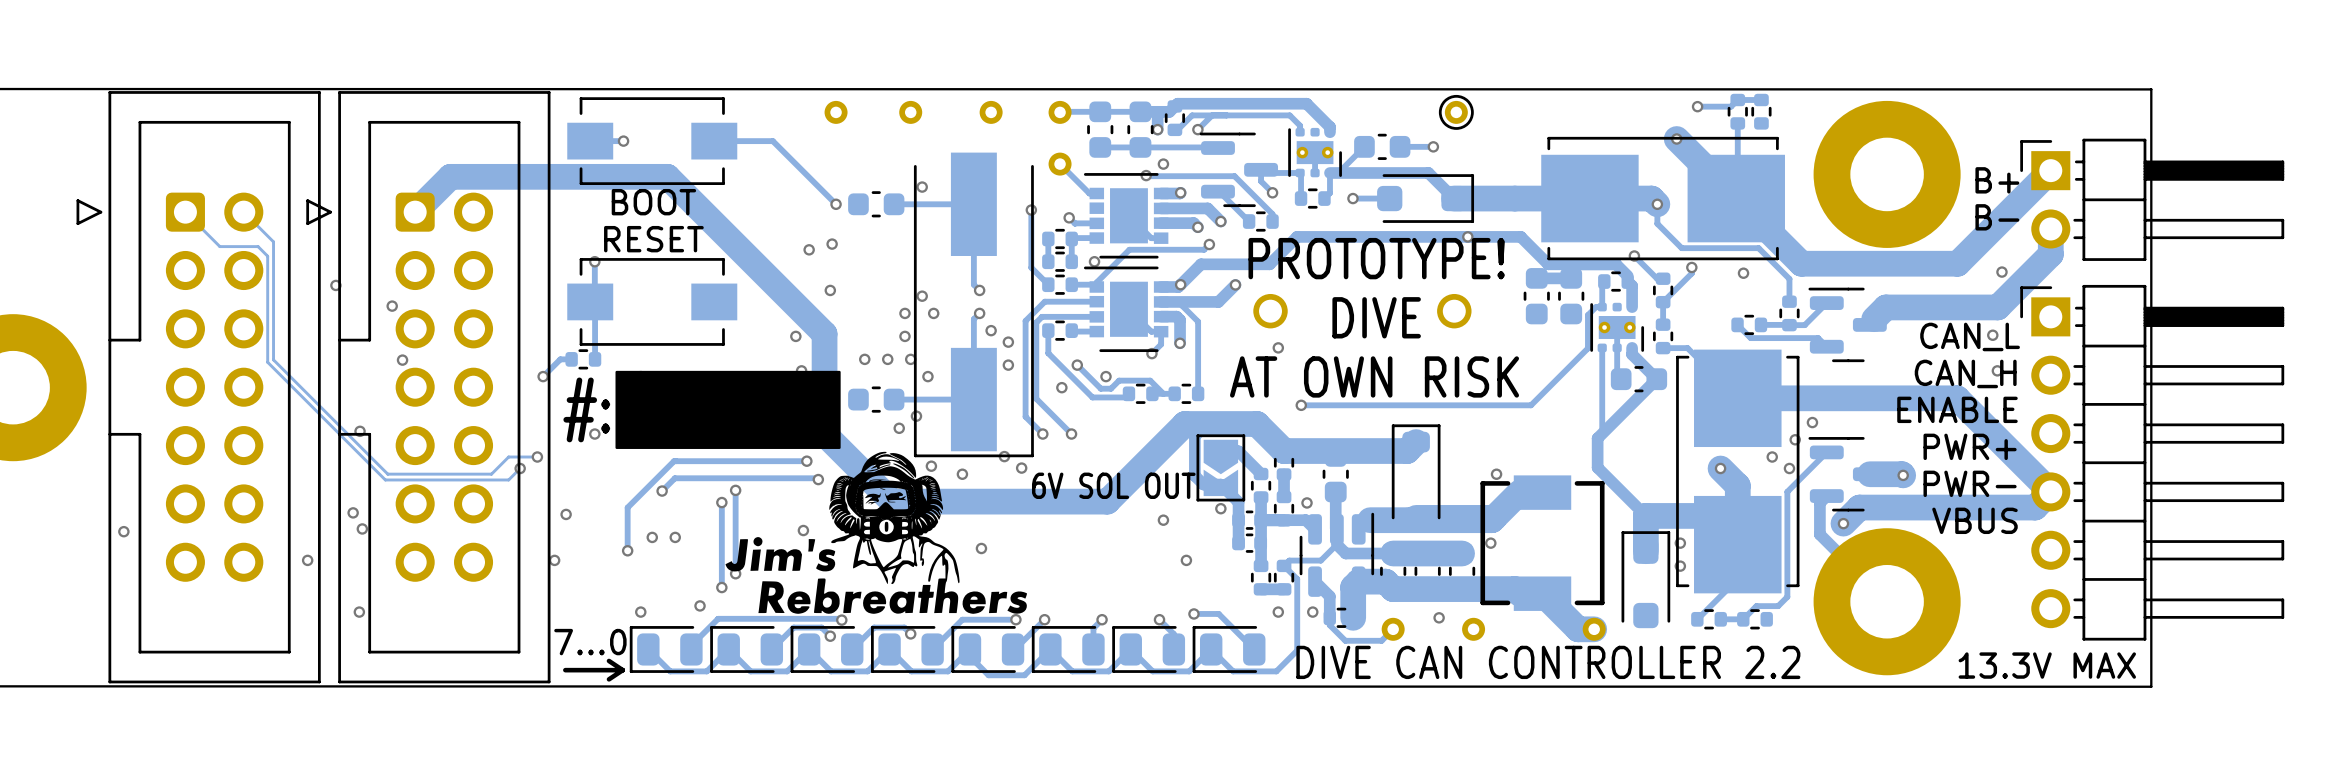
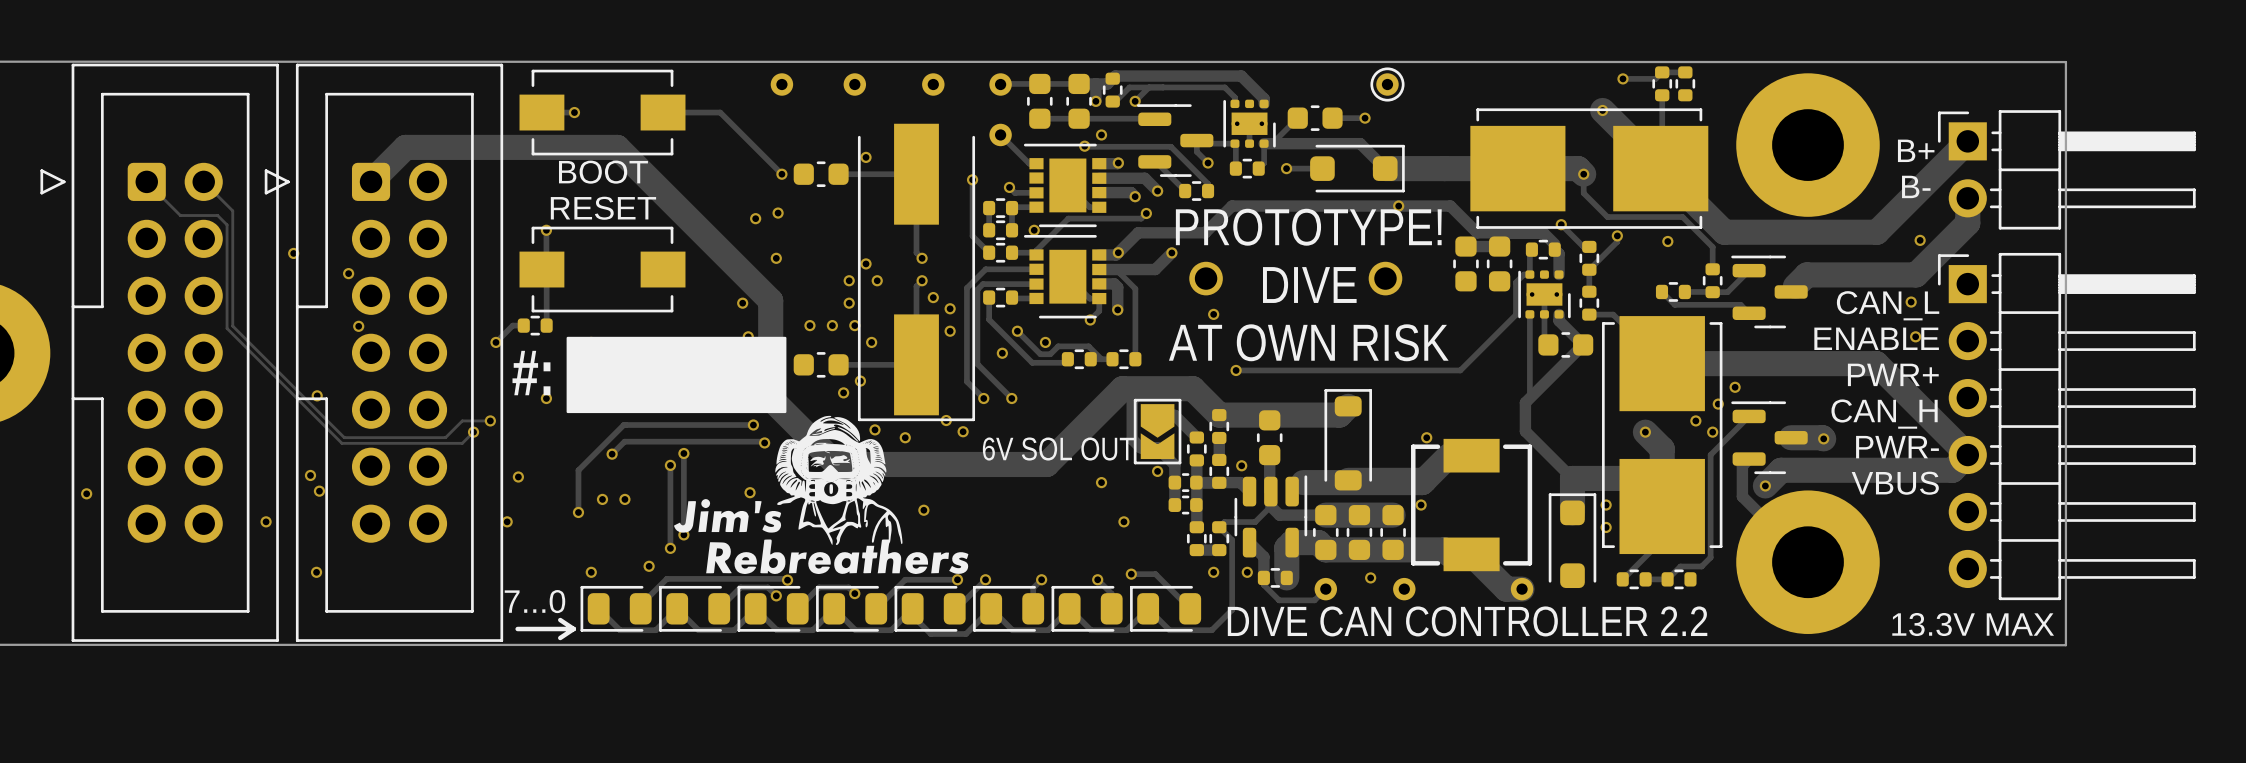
text: CAN_H (1965, 373) -> ENABLE (1876, 338)
text: ENABLE (1957, 409) -> PWR+ (1893, 374)
text: PWR+ (1970, 446) -> CAN_H (1884, 414)

